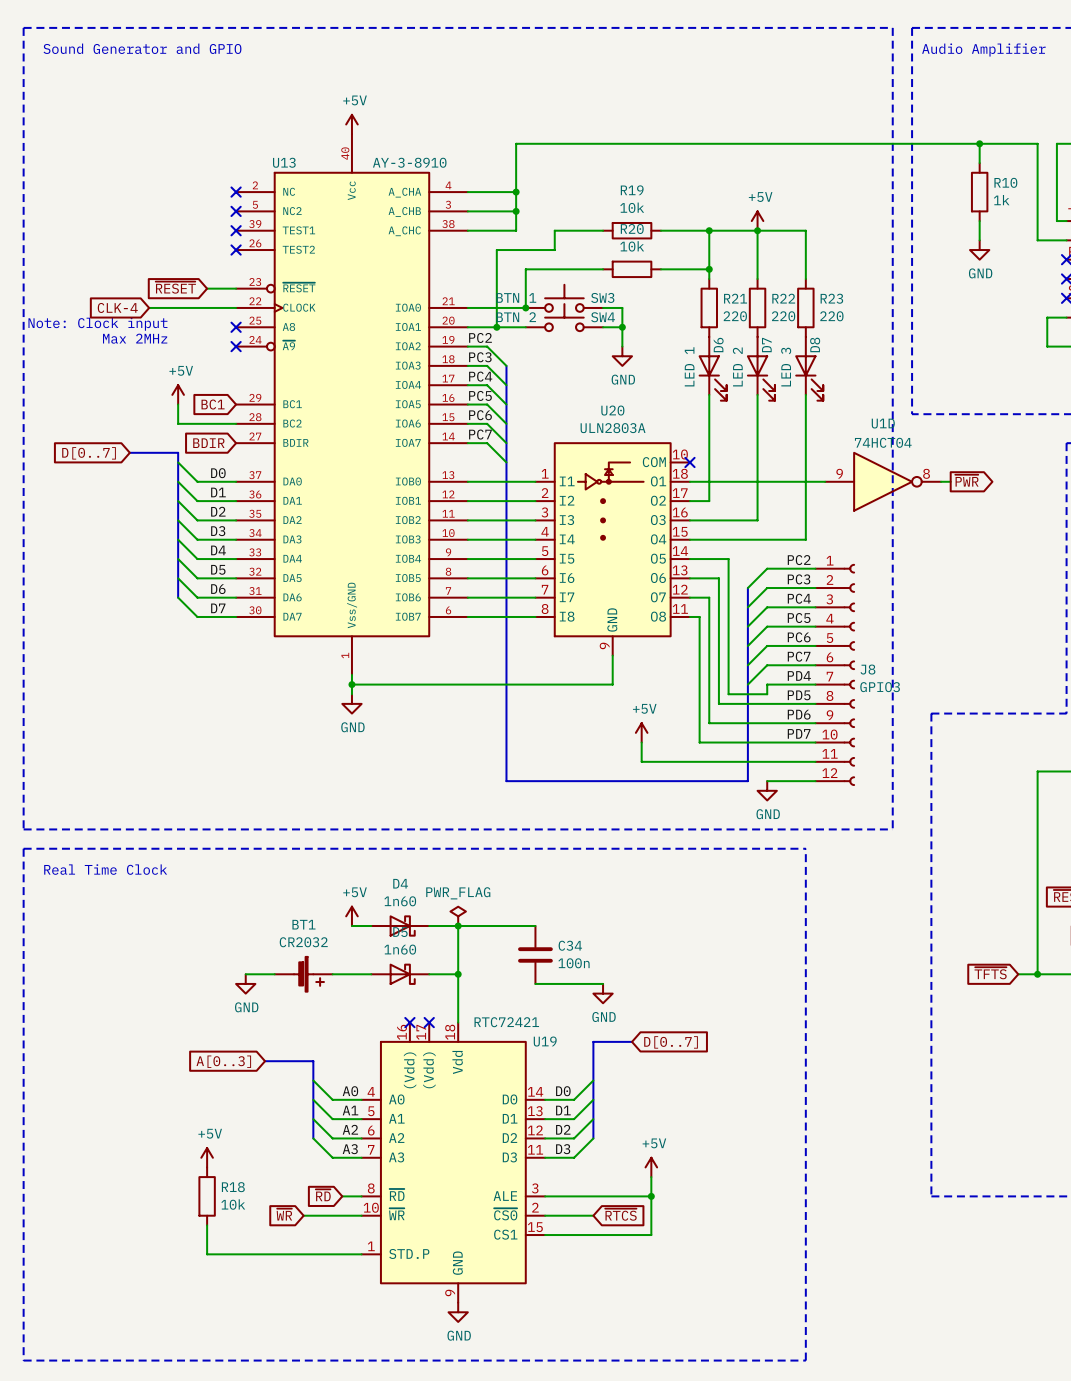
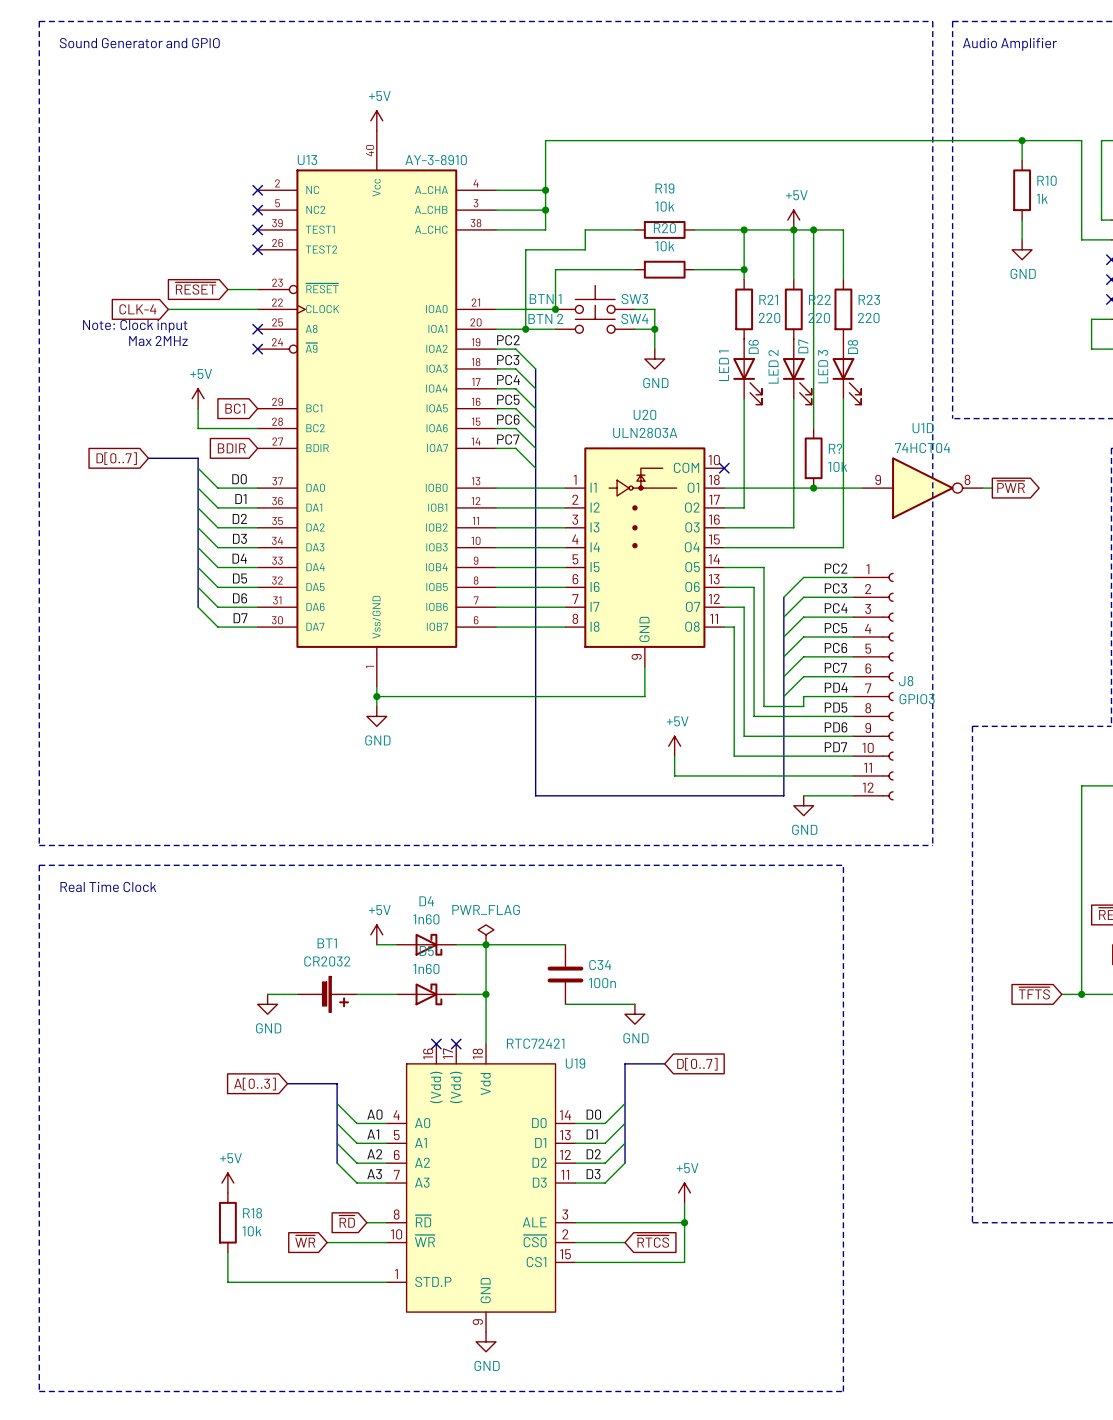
wire: none -> (813, 229) (813, 428)
junction: none -> (813, 229)
R?: none -> 10k (813, 458)
junction: none -> (813, 488)

